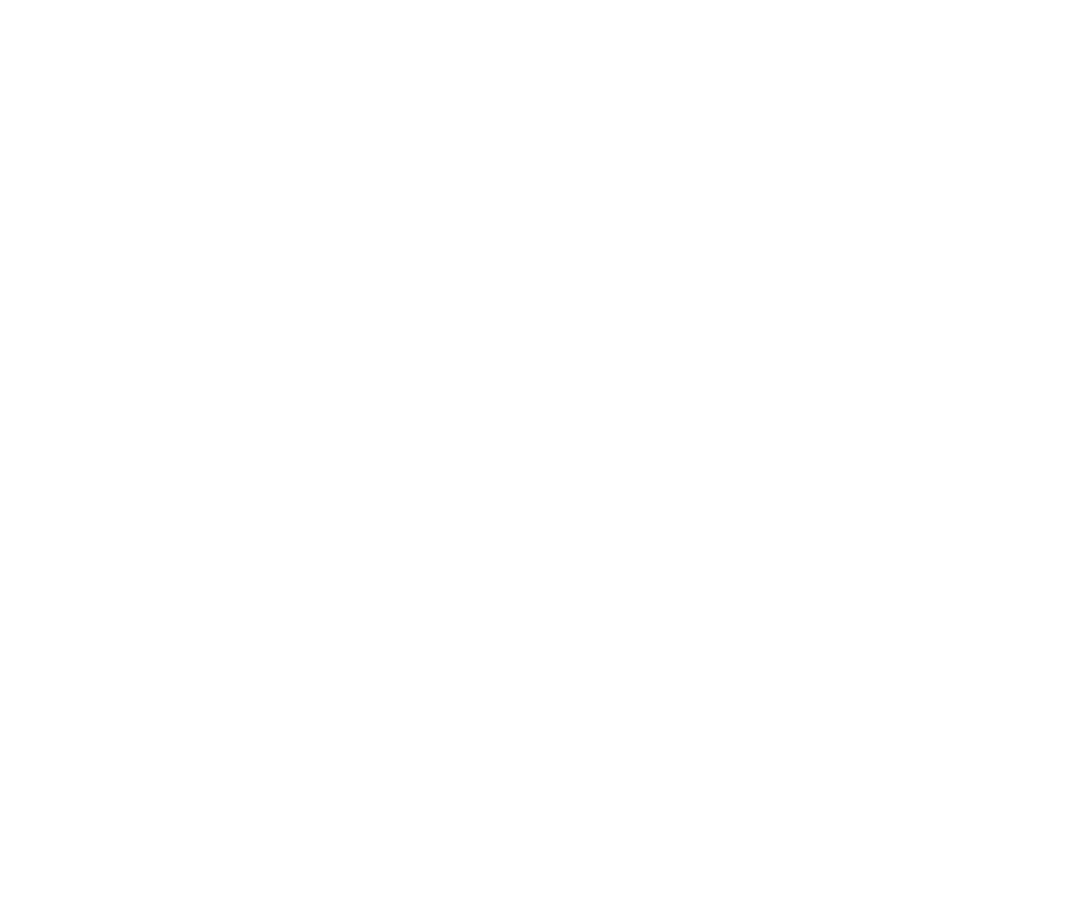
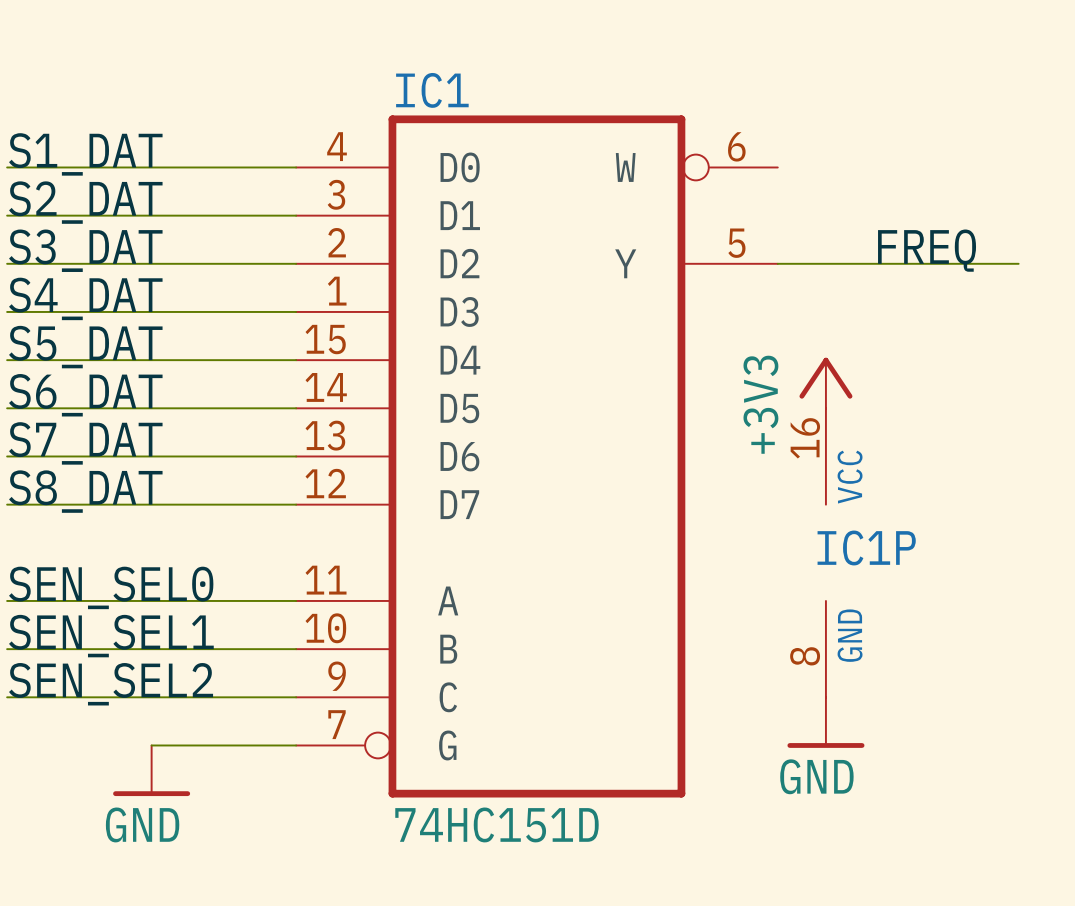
label: none -> S1_DAT (85, 154)
wire: none -> (7, 167) (296, 167)
label: none -> S2_DAT (85, 202)
wire: none -> (7, 215) (296, 215)
label: none -> S3_DAT (85, 250)
label: none -> FREQ (927, 250)
wire: none -> (7, 263) (296, 263)
wire: none -> (777, 263) (1018, 263)
label: none -> S4_DAT (85, 298)
wire: none -> (7, 311) (296, 311)
label: none -> S5_DAT (85, 347)
wire: none -> (7, 360) (296, 360)
power symbol: none -> +3V3 (825, 383)
label: none -> S6_DAT (85, 395)
wire: none -> (7, 408) (296, 408)
label: none -> S7_DAT (85, 443)
wire: none -> (7, 456) (296, 456)
IC1: none -> 74HC151D (536, 456)
label: none -> S8_DAT (85, 491)
wire: none -> (7, 504) (296, 504)
IC1P: none -> (825, 552)
label: none -> SEN_SEL0 (111, 587)
wire: none -> (7, 600) (296, 600)
label: none -> SEN_SEL1 (111, 636)
wire: none -> (7, 649) (296, 649)
label: none -> SEN_SEL2 (111, 684)
wire: none -> (7, 697) (296, 697)
power symbol: none -> GND (825, 722)
wire: none -> (151, 745) (296, 745)
power symbol: none -> GND (151, 770)

